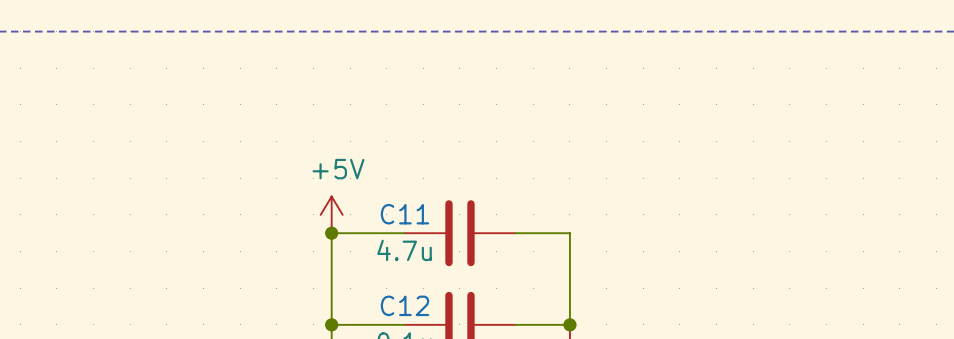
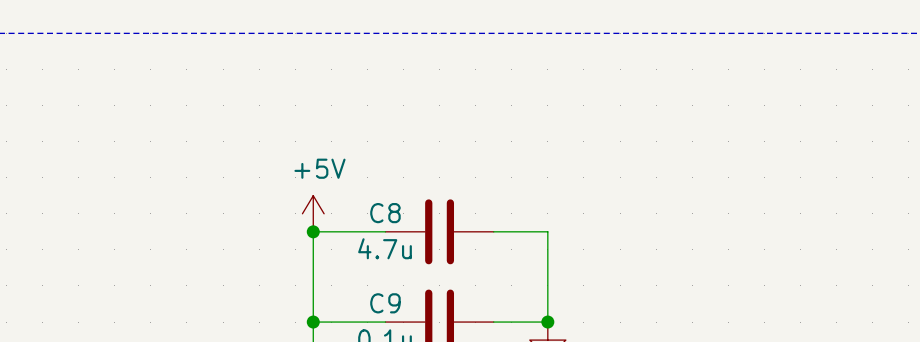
C11 name: C11 (404, 214) -> C8 (385, 213)
C12 name: C12 (404, 305) -> C9 (385, 303)

